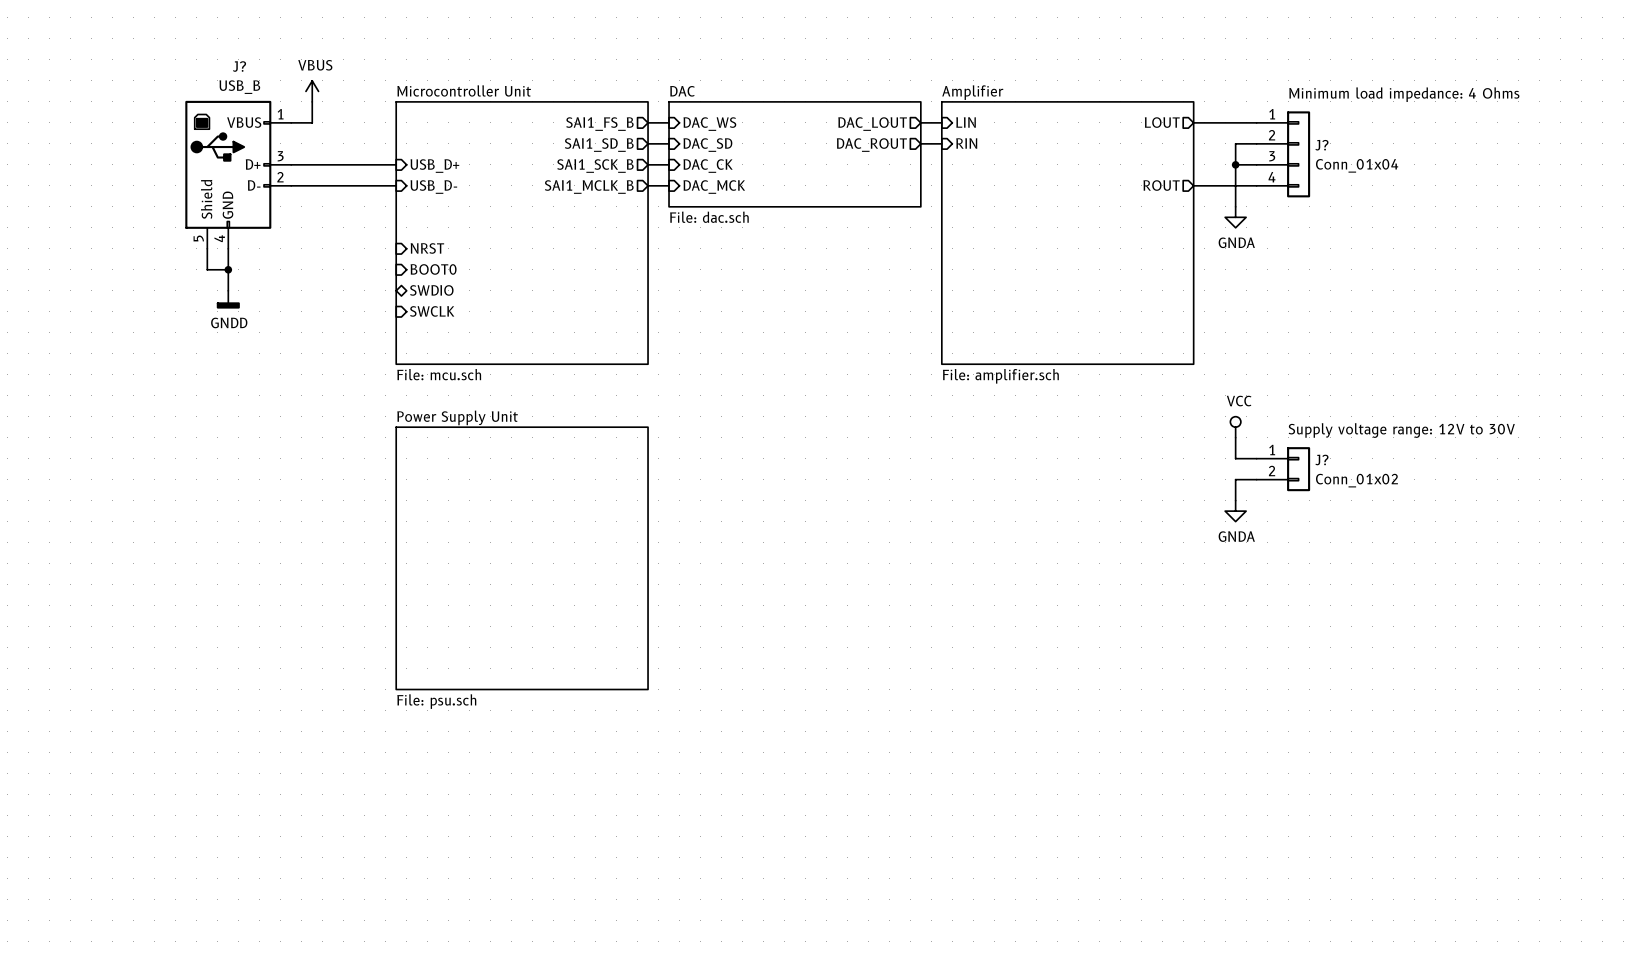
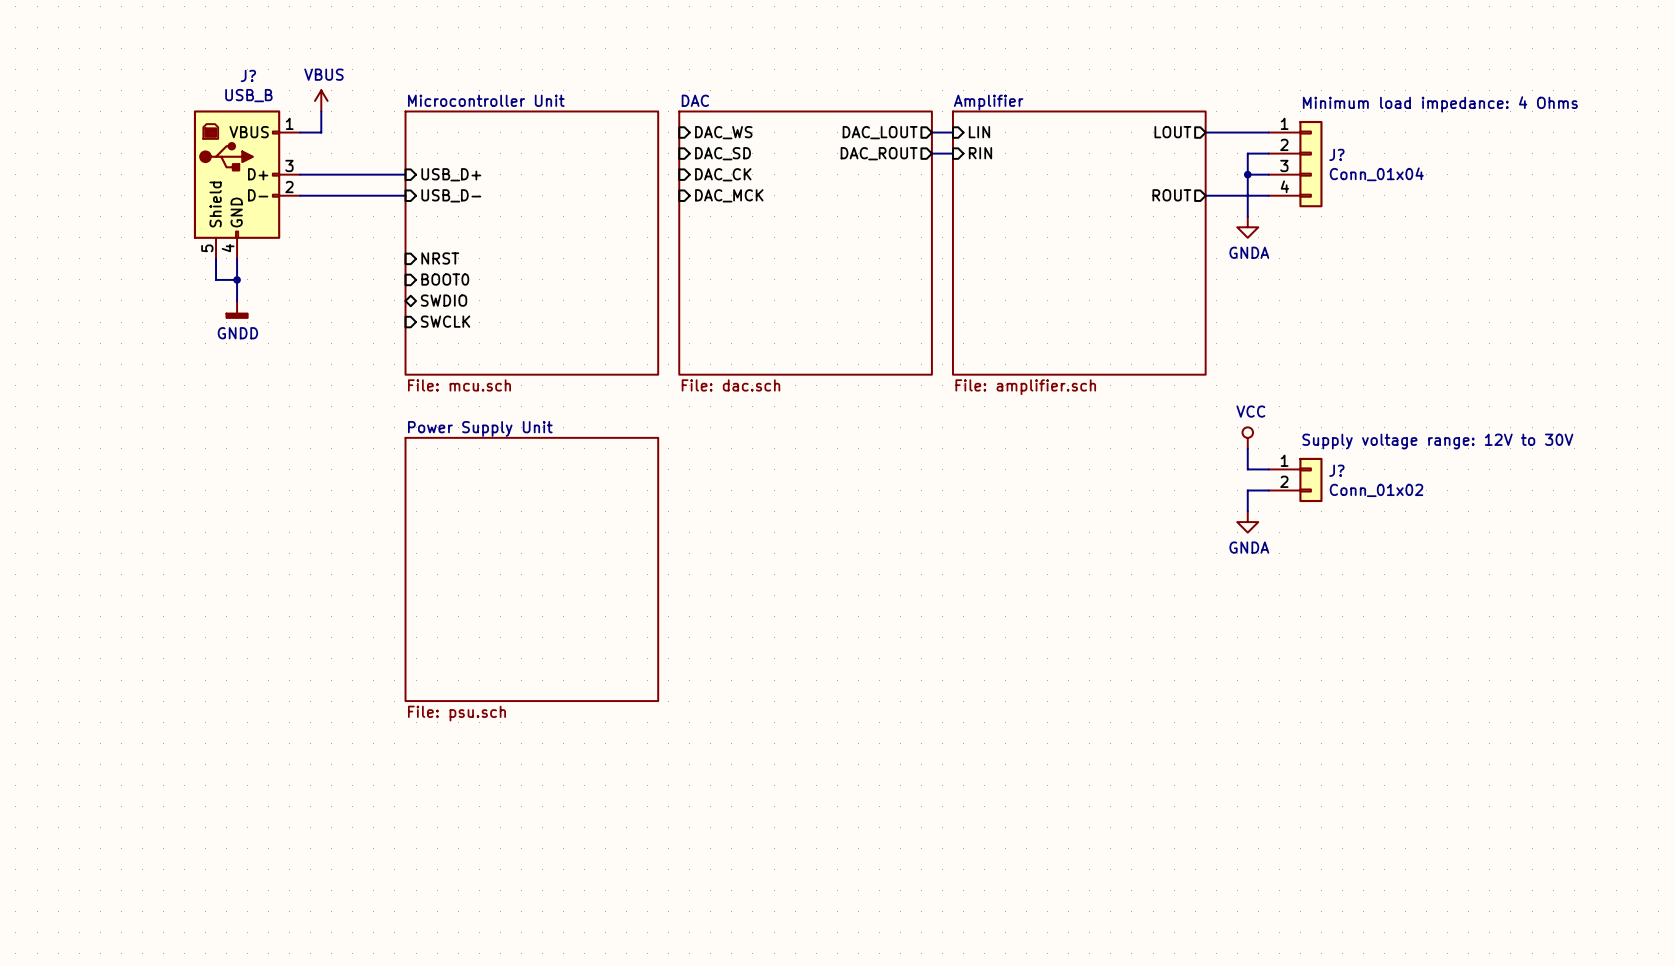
wire: (648, 122) (669, 122) -> none
sheet pin: SAI1_FS_B (599, 124) -> none
wire: (648, 143) (669, 143) -> none
sheet pin: SAI1_SD_B (599, 145) -> none
sheet DAC: File: dac.sch (794, 154) -> none
wire: (648, 164) (669, 164) -> none
sheet pin: SAI1_SCK_B (595, 166) -> none
wire: (648, 185) (669, 185) -> none
sheet pin: SAI1_MCLK_B (589, 187) -> none
sheet DAC: none -> File: dac.sch (805, 243)

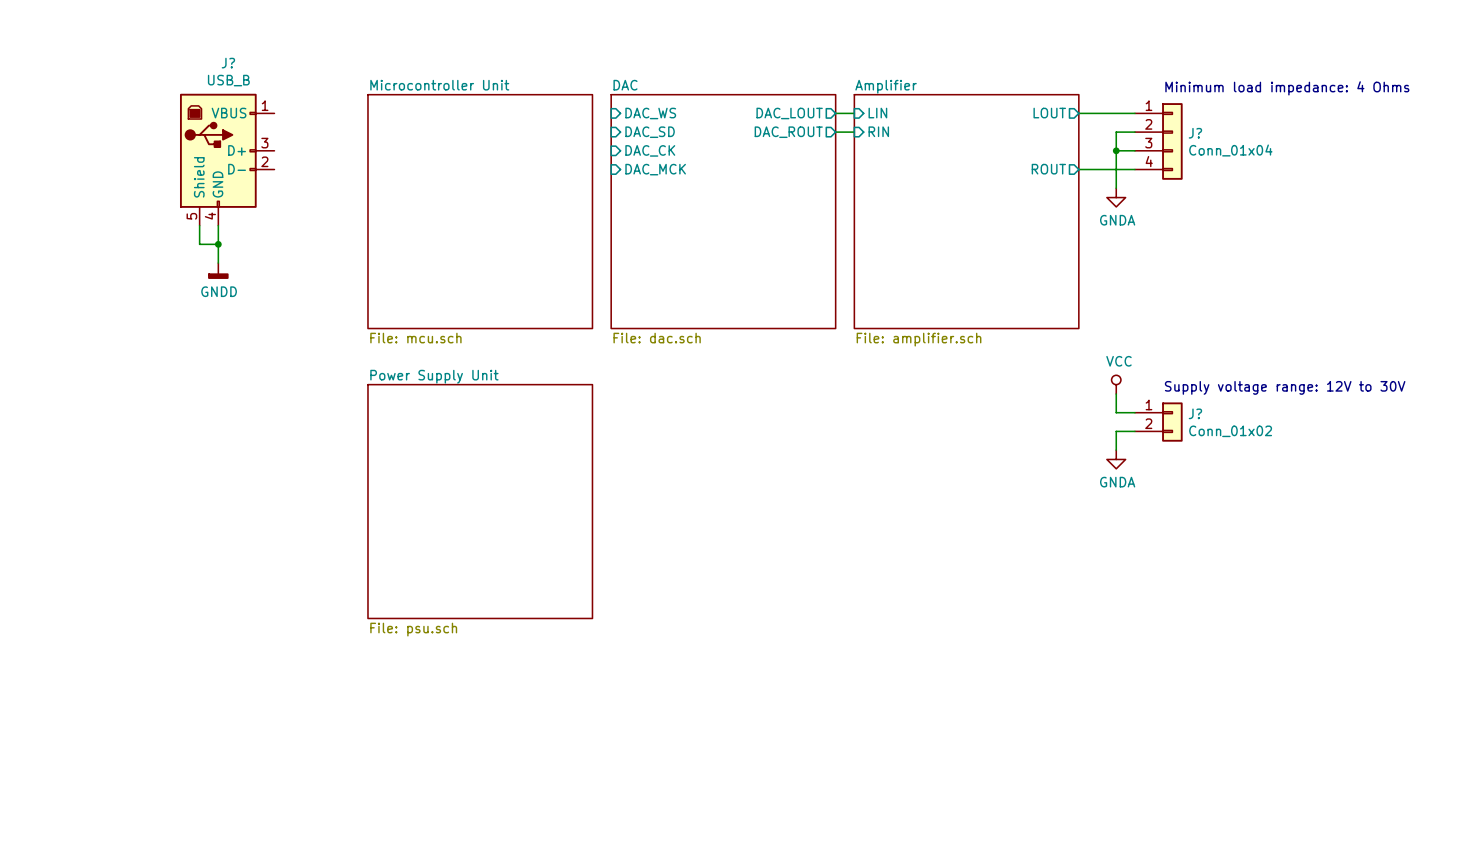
power symbol: VBUS (321, 100) -> none
wire: (321, 111) (321, 132) (300, 132) -> none
wire: (300, 174) (405, 174) -> none
sheet pin: USB_D+ (451, 174) -> none
wire: (300, 195) (405, 195) -> none
sheet pin: USB_D- (451, 195) -> none
sheet pin: NRST (440, 258) -> none
sheet pin: BOOT0 (445, 279) -> none
sheet pin: SWDIO (444, 300) -> none
sheet pin: SWCLK (445, 321) -> none

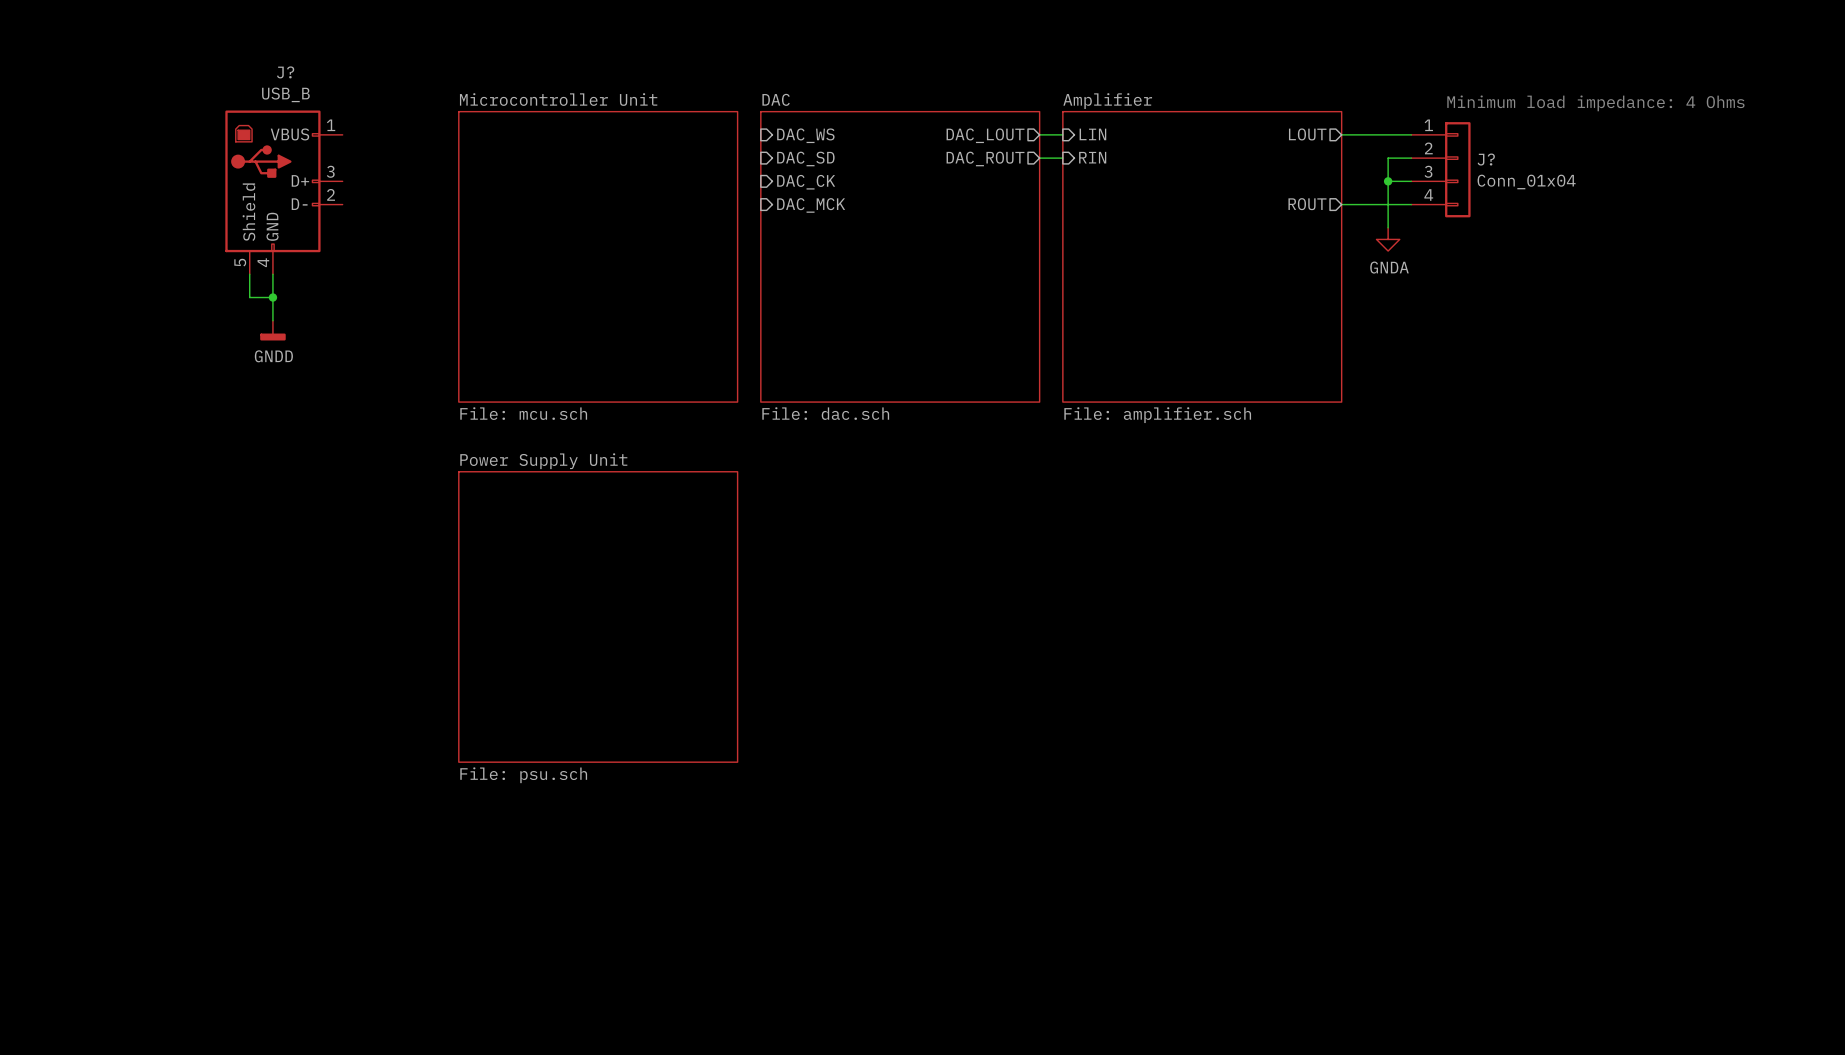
power symbol: VCC (1116, 384) -> none
text: Supply voltage range: 12V to 30V (1285, 387) -> none
wire: (1116, 393) (1116, 412) (1134, 412) -> none
J?: Conn_01x02 (1158, 422) -> none
wire: (1134, 431) (1116, 431) (1116, 450) -> none
power symbol: GNDA (1116, 459) -> none

